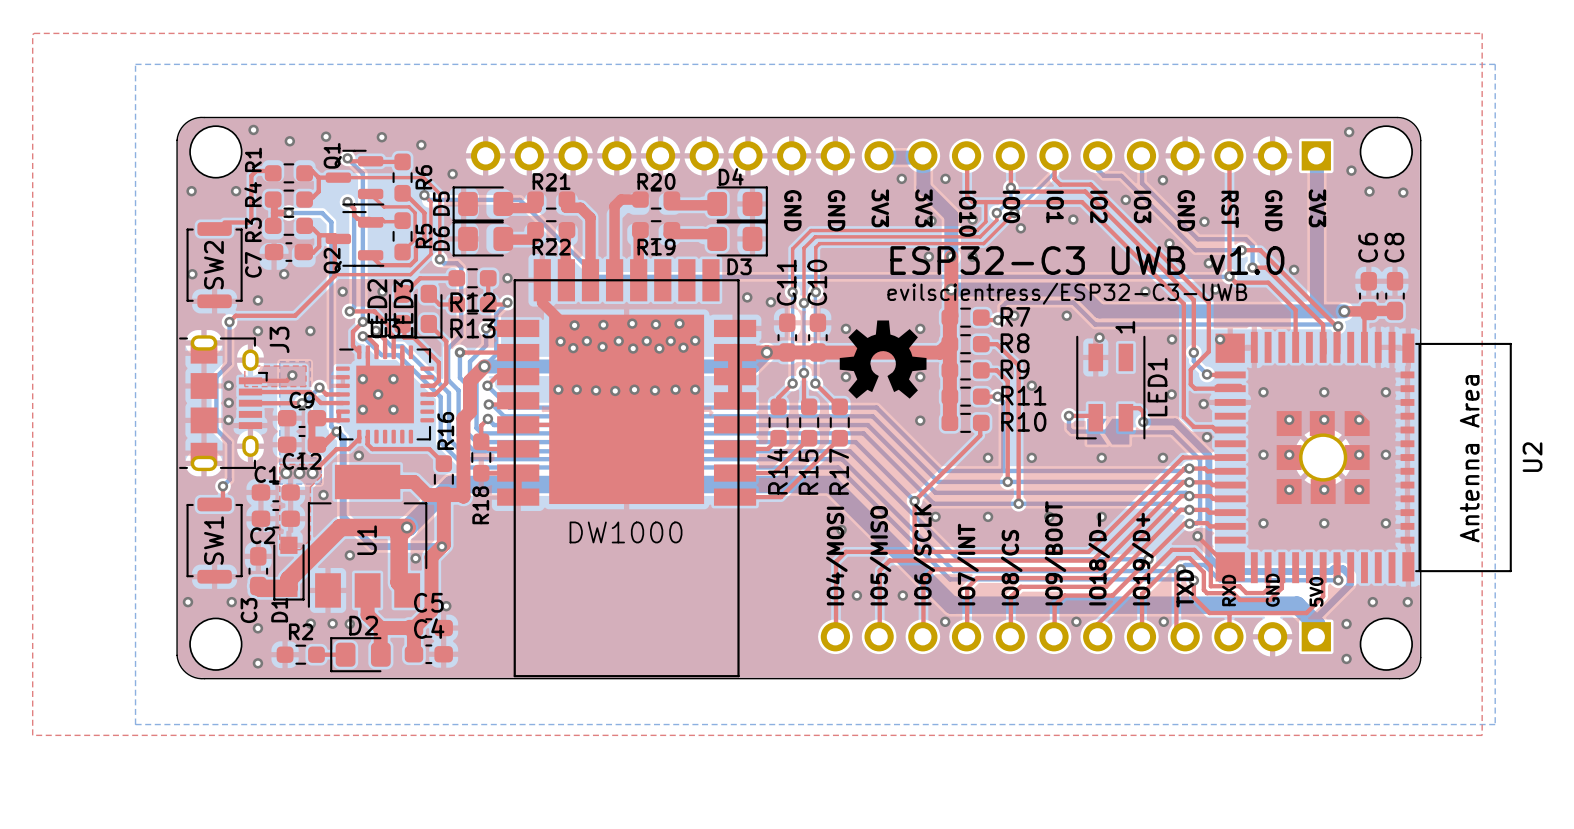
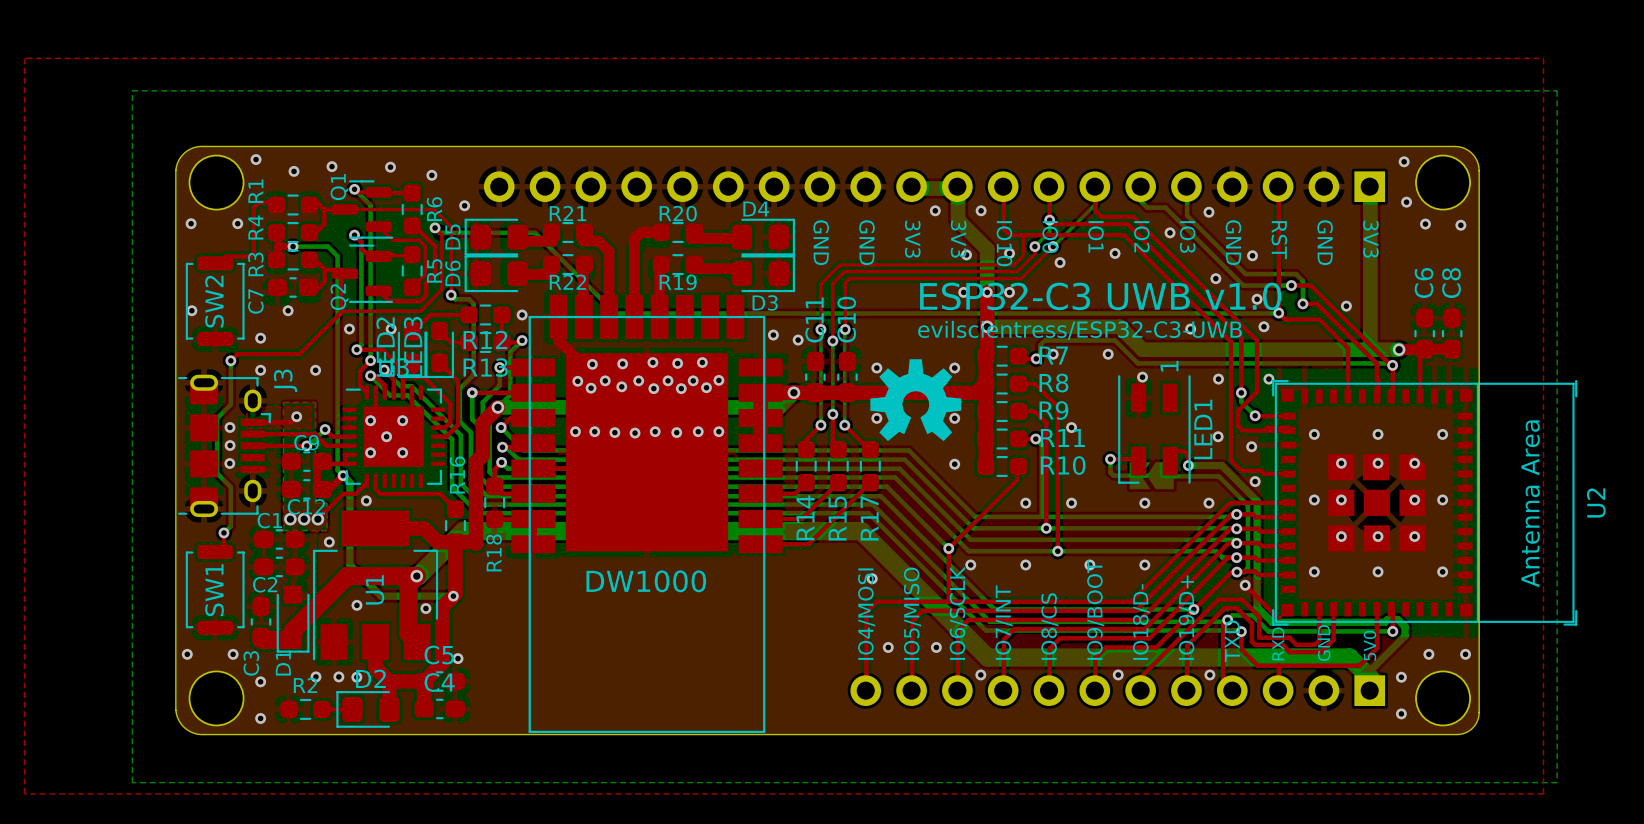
U2 footprint: [1214, 331, 1512, 584] -> [1272, 379, 1578, 626]

